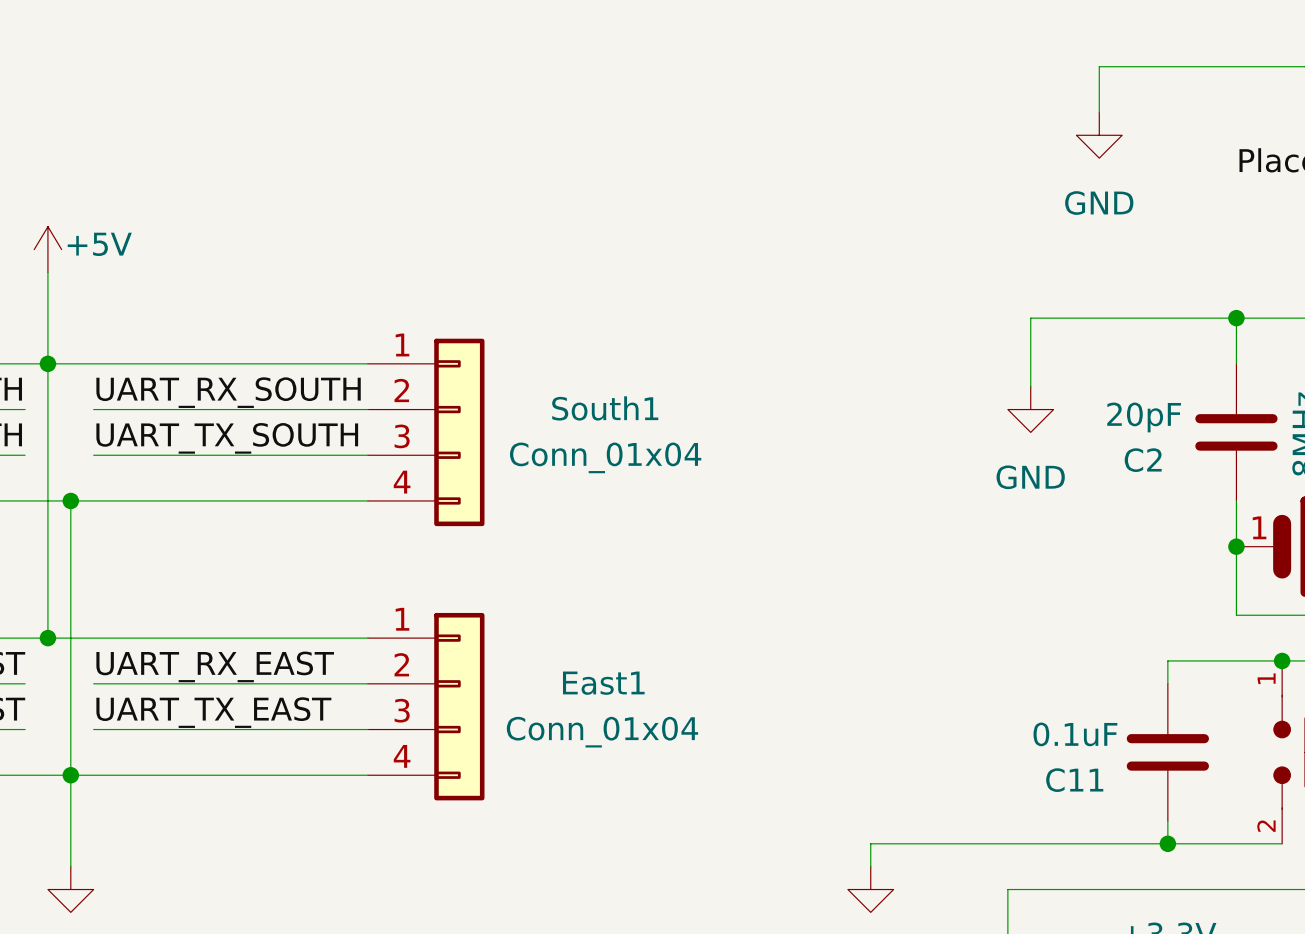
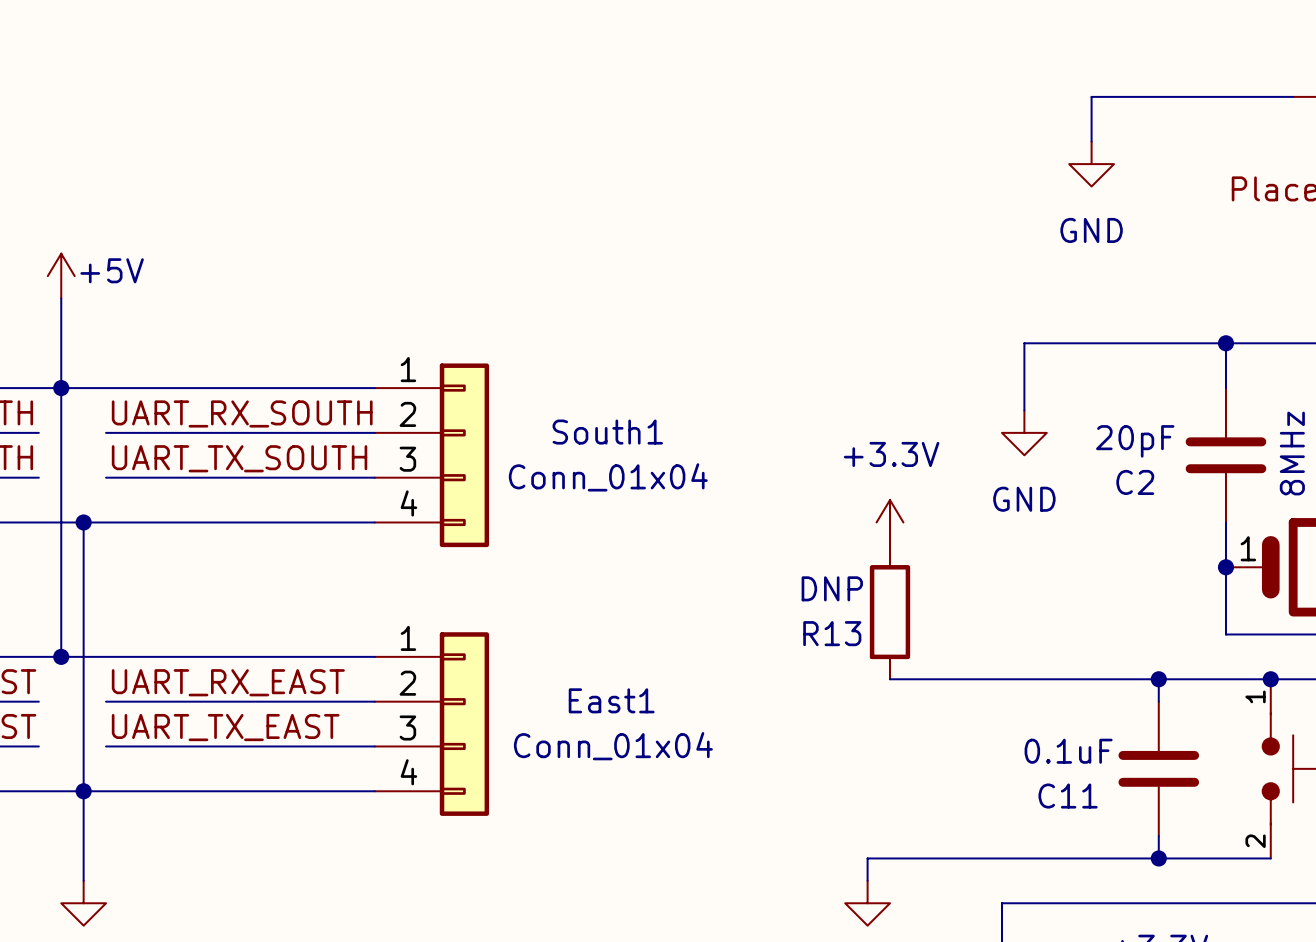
power symbol: none -> +3.3V (890, 522)
R13: none -> DNP (890, 612)
wire: none -> (890, 679) (1158, 679)
junction: none -> (1158, 679)

